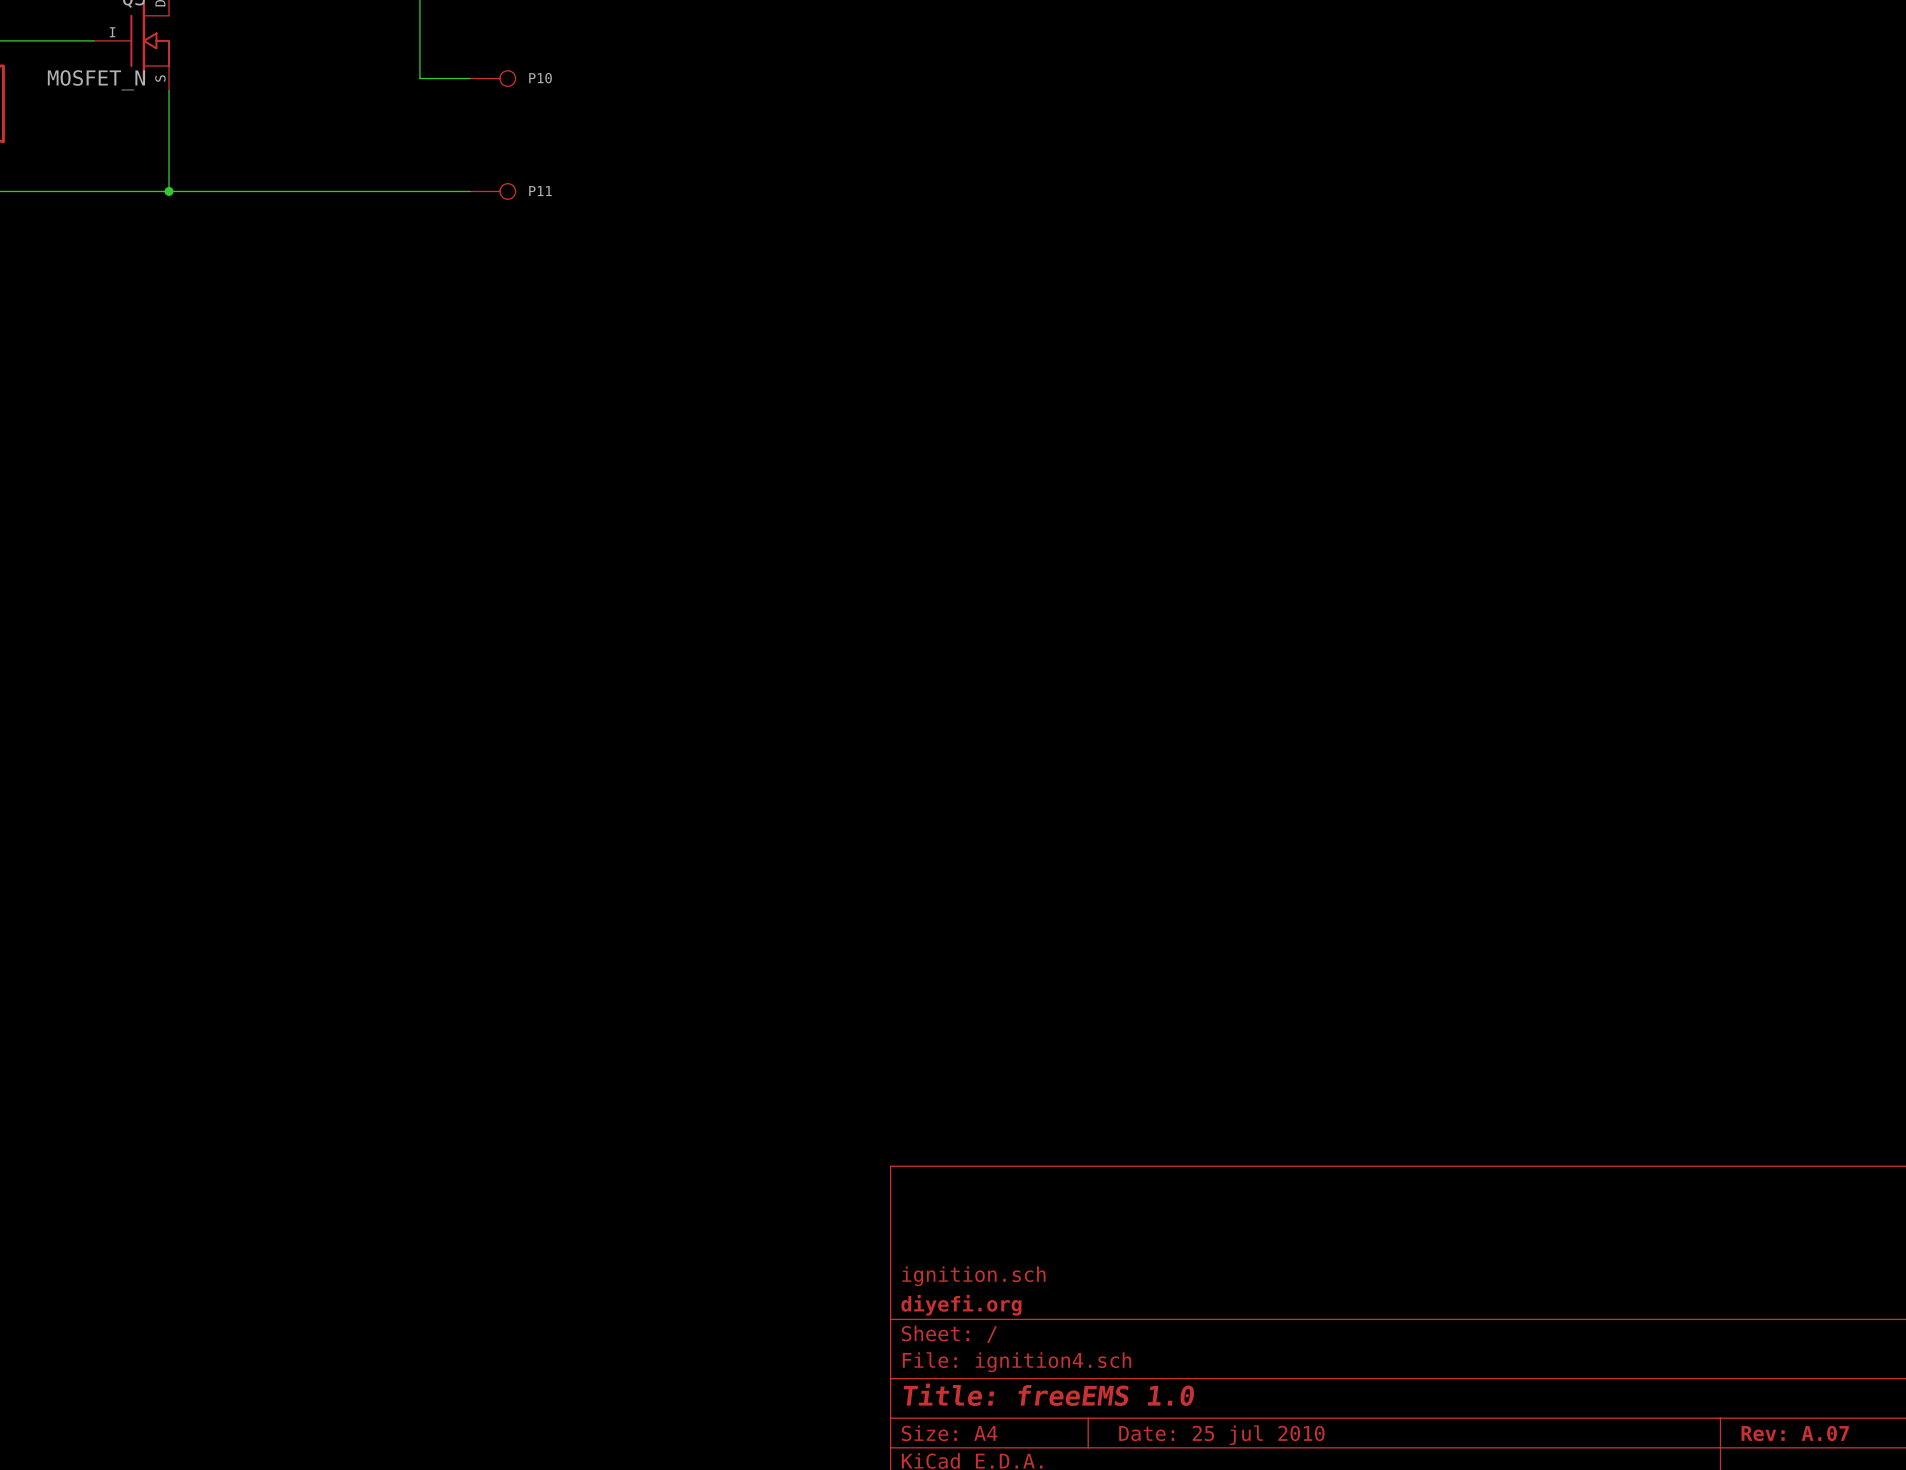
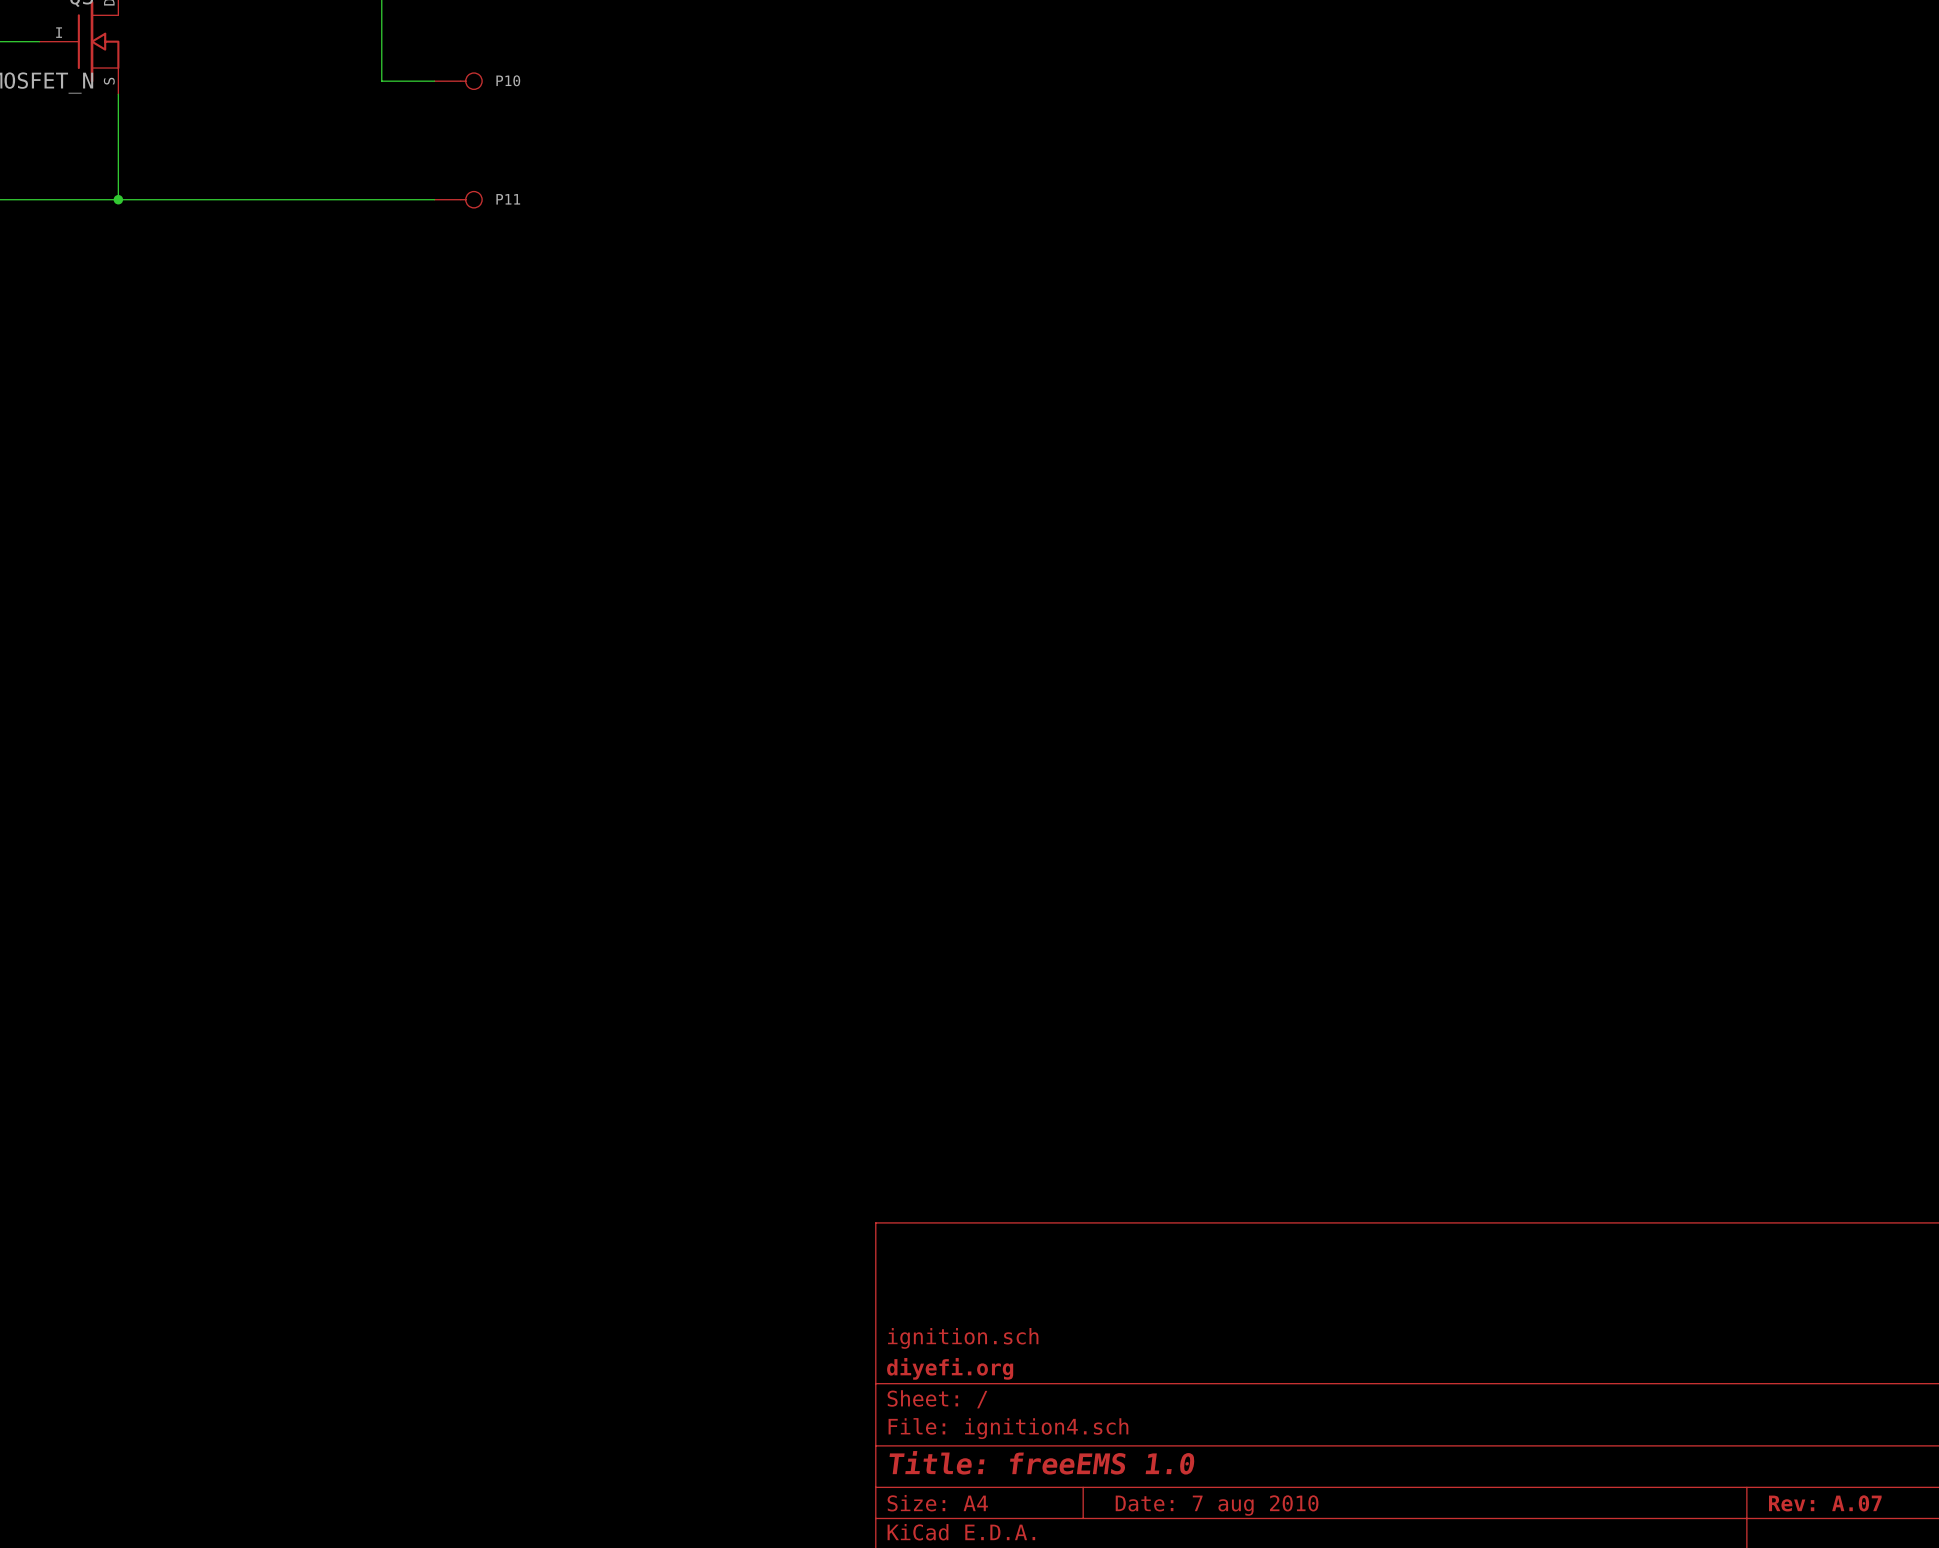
title block: Date: 25 jul 2010 (1221, 1435) -> Date: 7 aug 2010 (1217, 1505)

